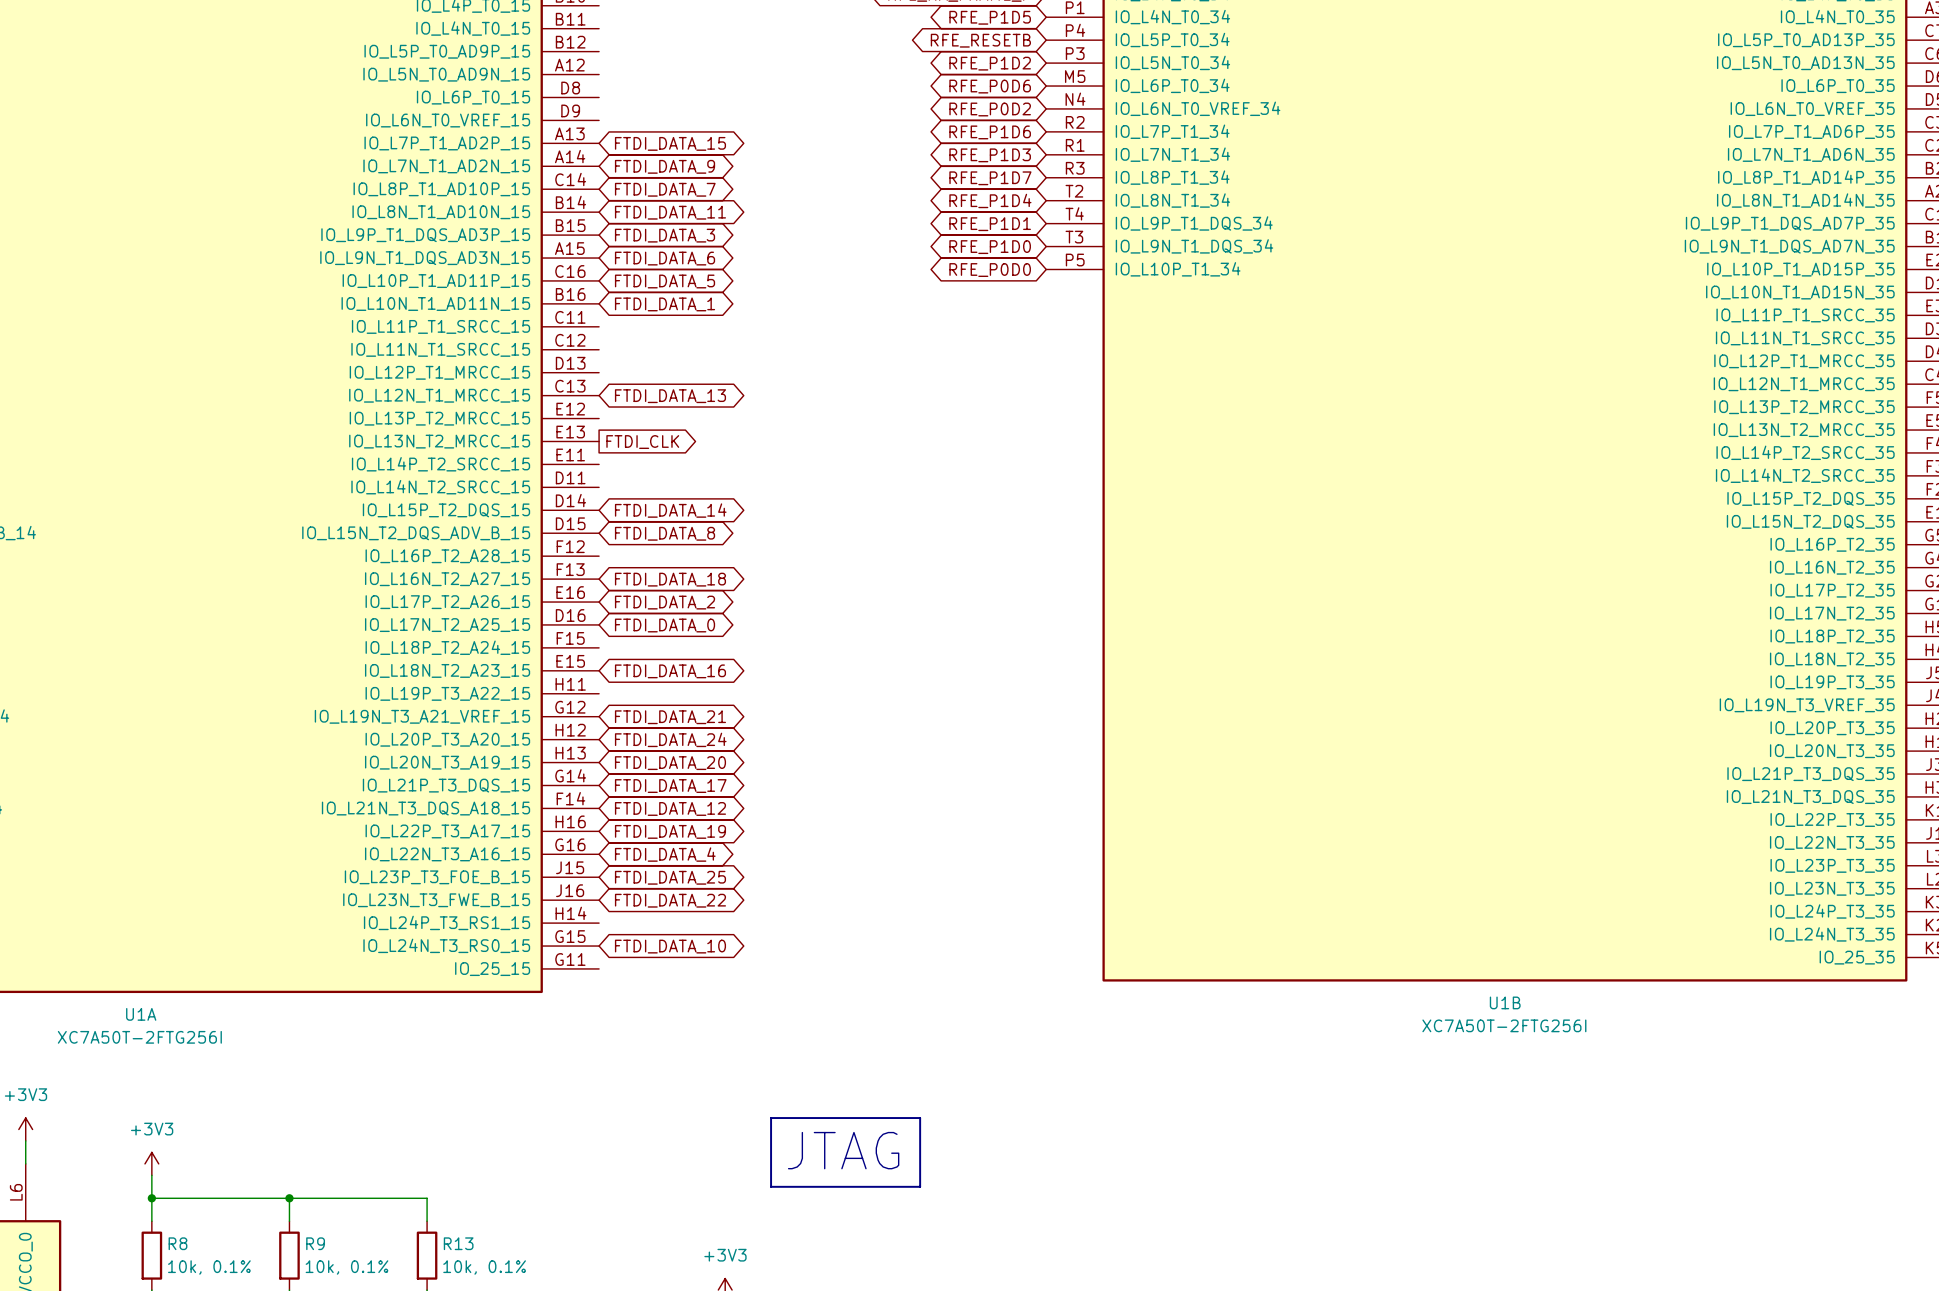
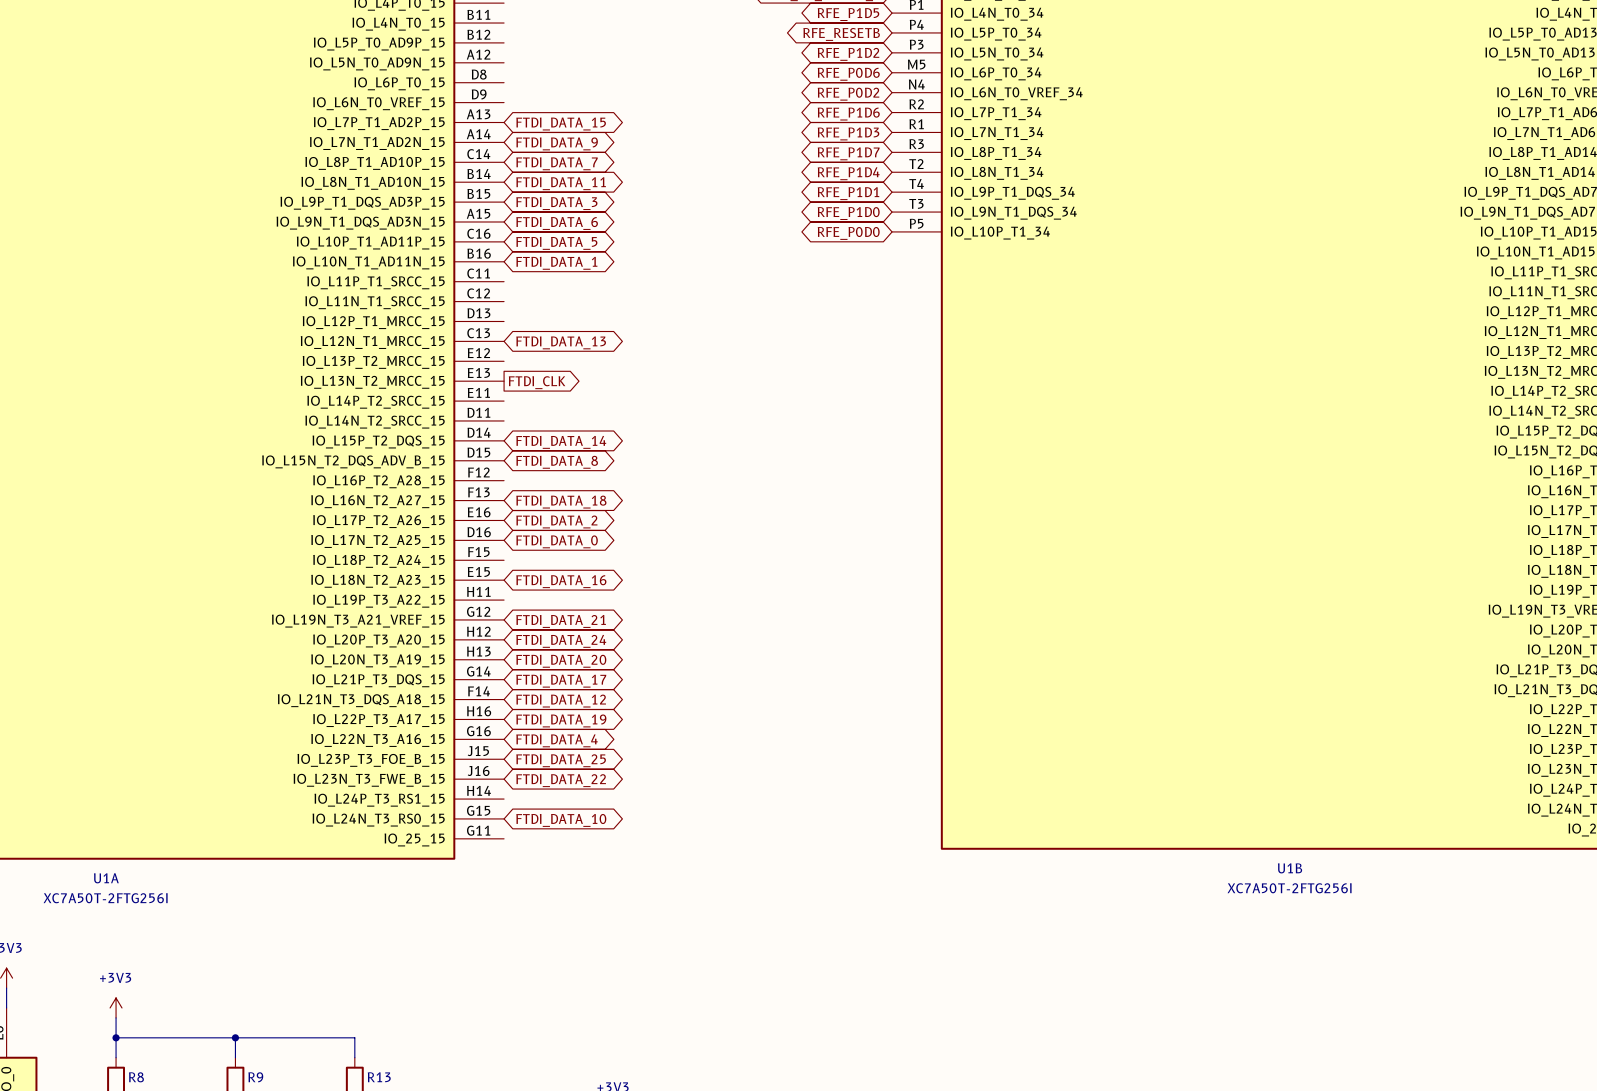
line: (771, 1118) (920, 1118) (920, 1186) (771, 1186) (771, 1118) -> none
text: JTAG (843, 1150) -> none

